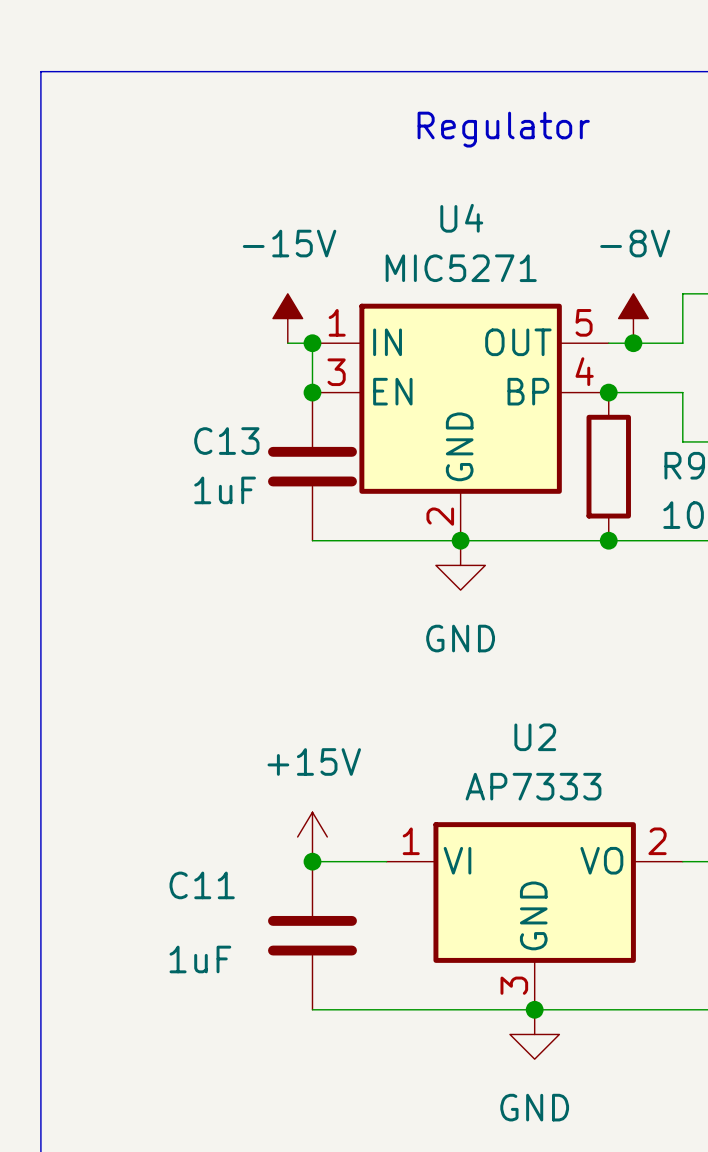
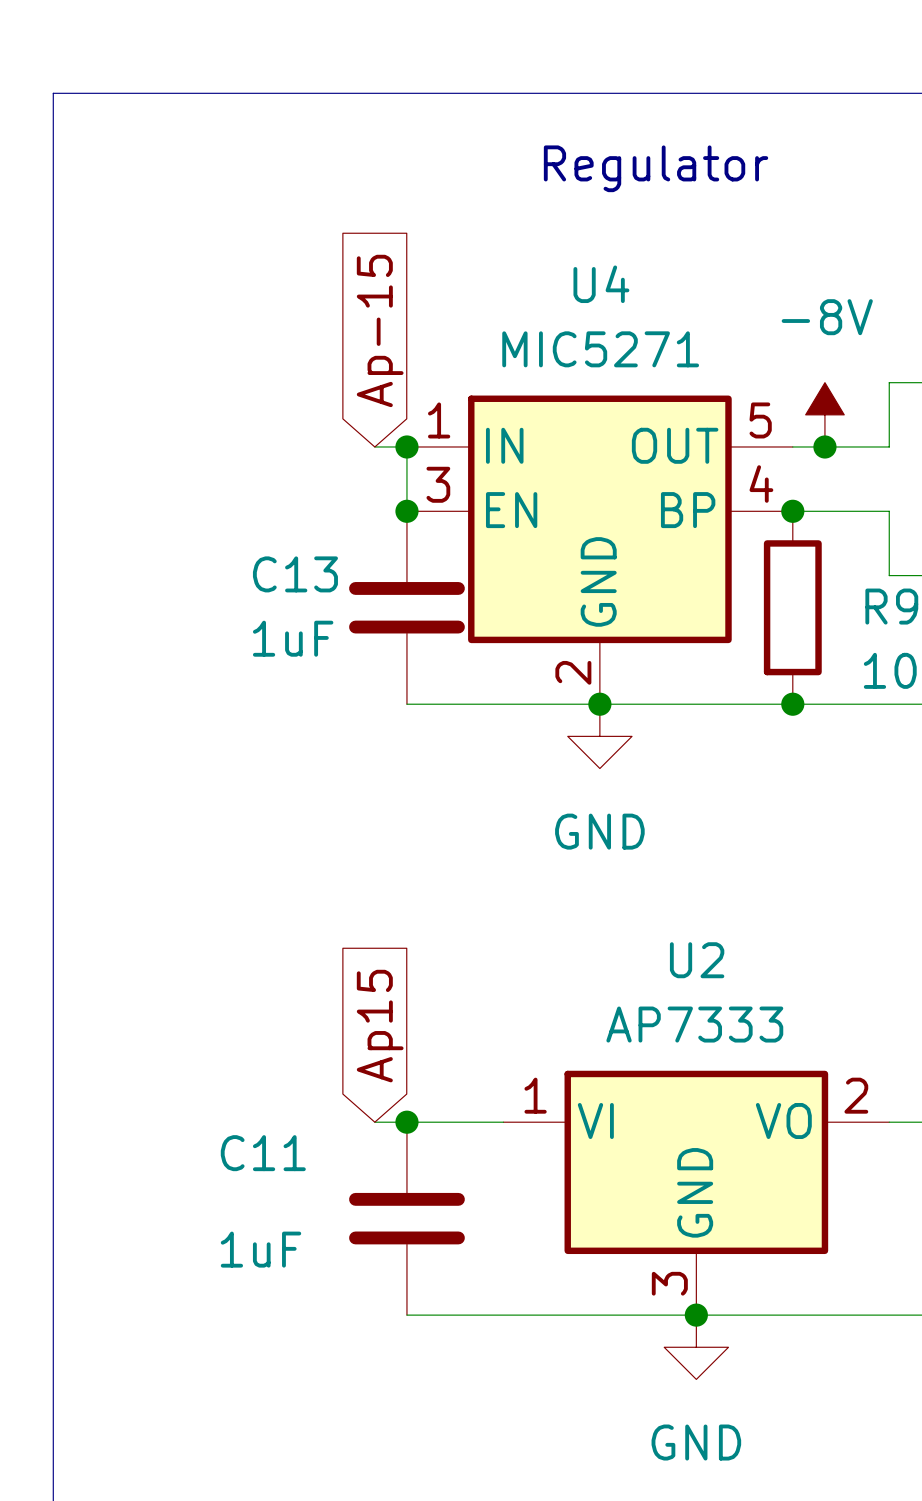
global label: none -> Ap-15 (380, 330)
power symbol: -15V (287, 318) -> none
global label: none -> Ap15 (380, 1026)
power symbol: +15V (312, 836) -> none
wire: none -> (374, 1122) (406, 1122)

